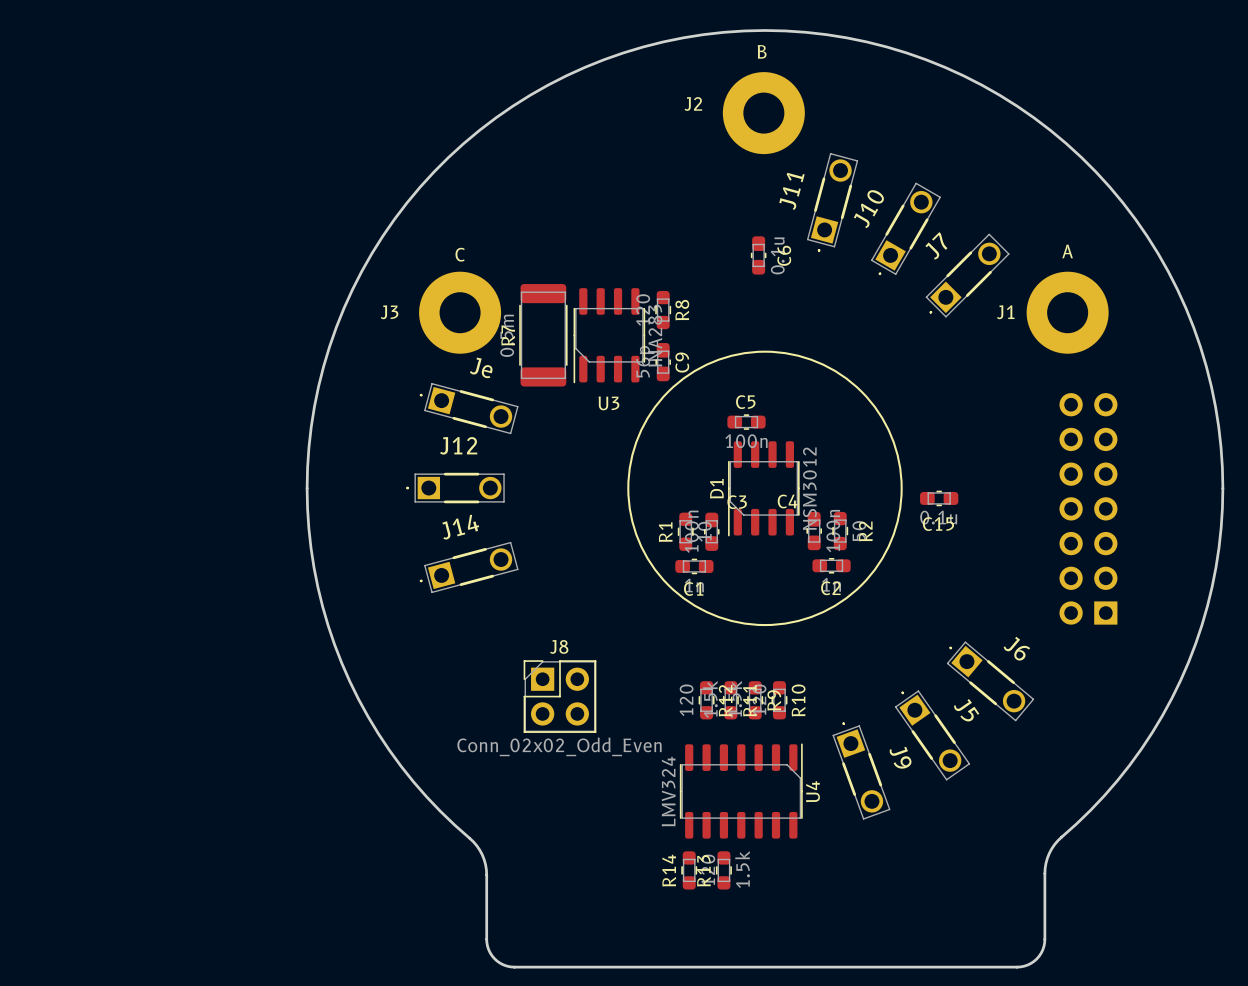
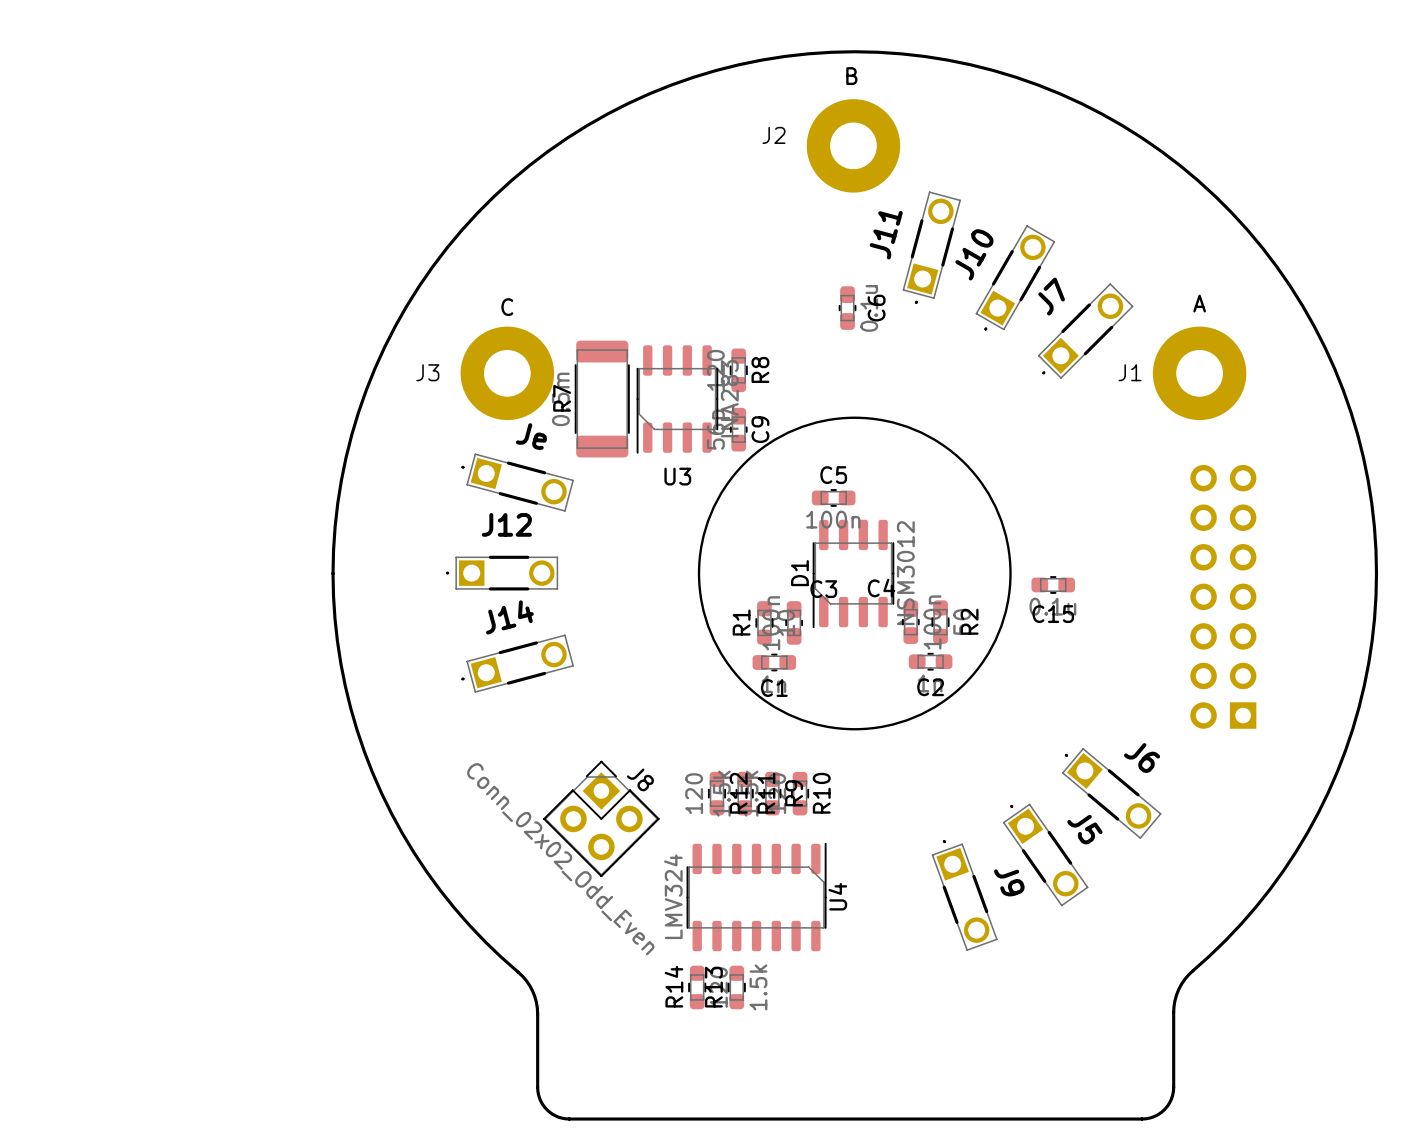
J8 rotation: 0° (559, 696) -> 45° clockwise (601, 818)
R12 position: (706, 700) -> (716, 793)
R11 position: (730, 700) -> (744, 793)
R9 position: (755, 700) -> (772, 793)
R10 position: (779, 700) -> (800, 793)
U4 position: (741, 791) -> (756, 897)
R14 position: (689, 870) -> (697, 987)
R13 position: (723, 870) -> (736, 987)

